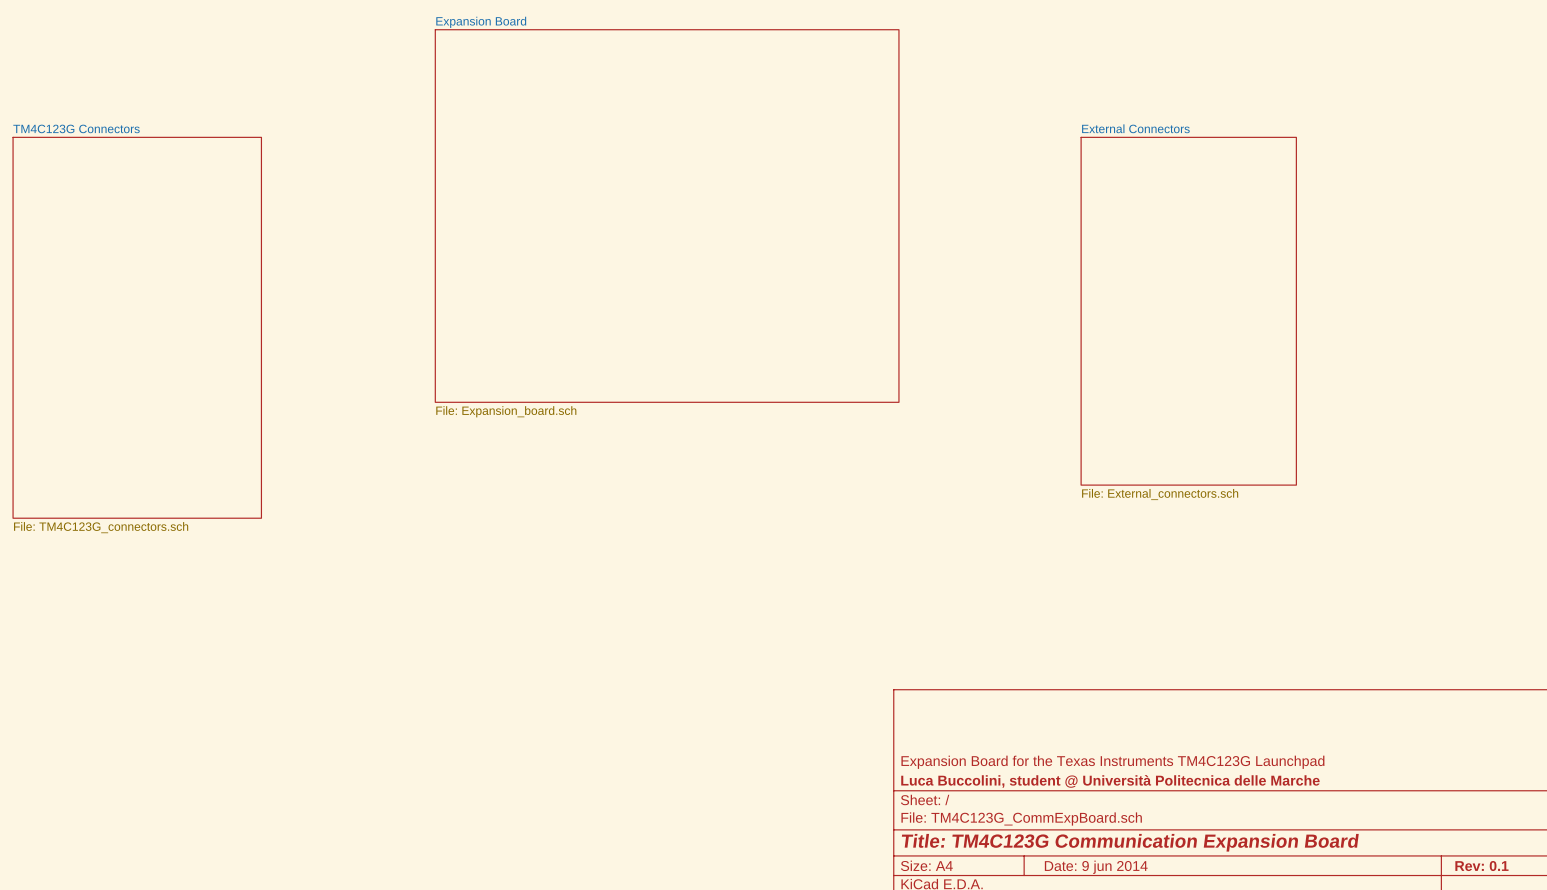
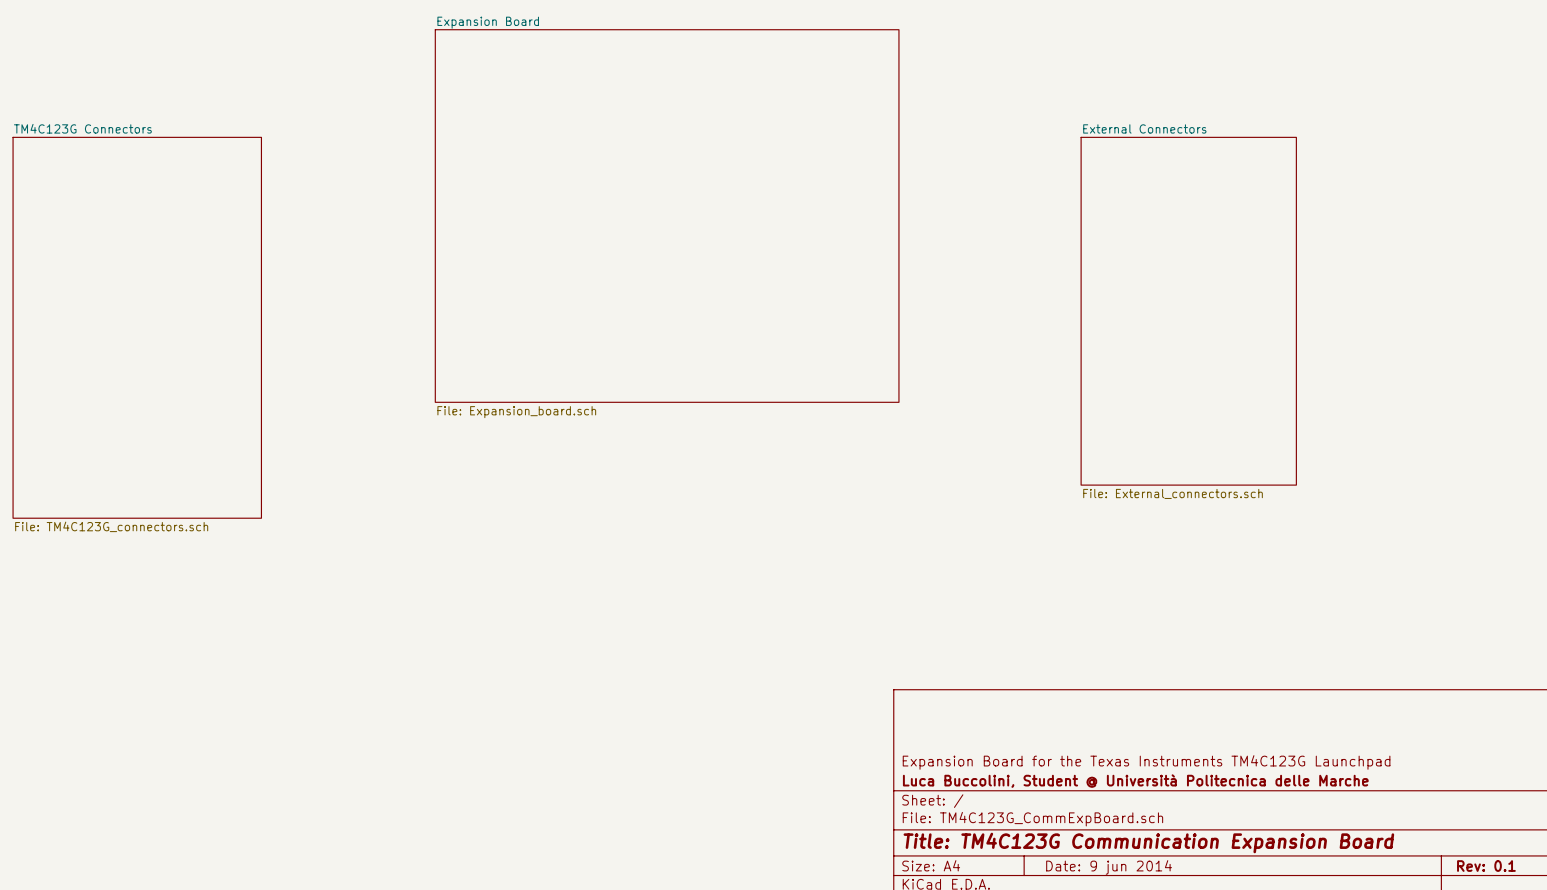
title block: Luca Buccolini, student @ Università Politecnica delle Marche (1110, 781) -> Luca Buccolini, Student @ Università Politecnica delle Marche (1135, 781)

